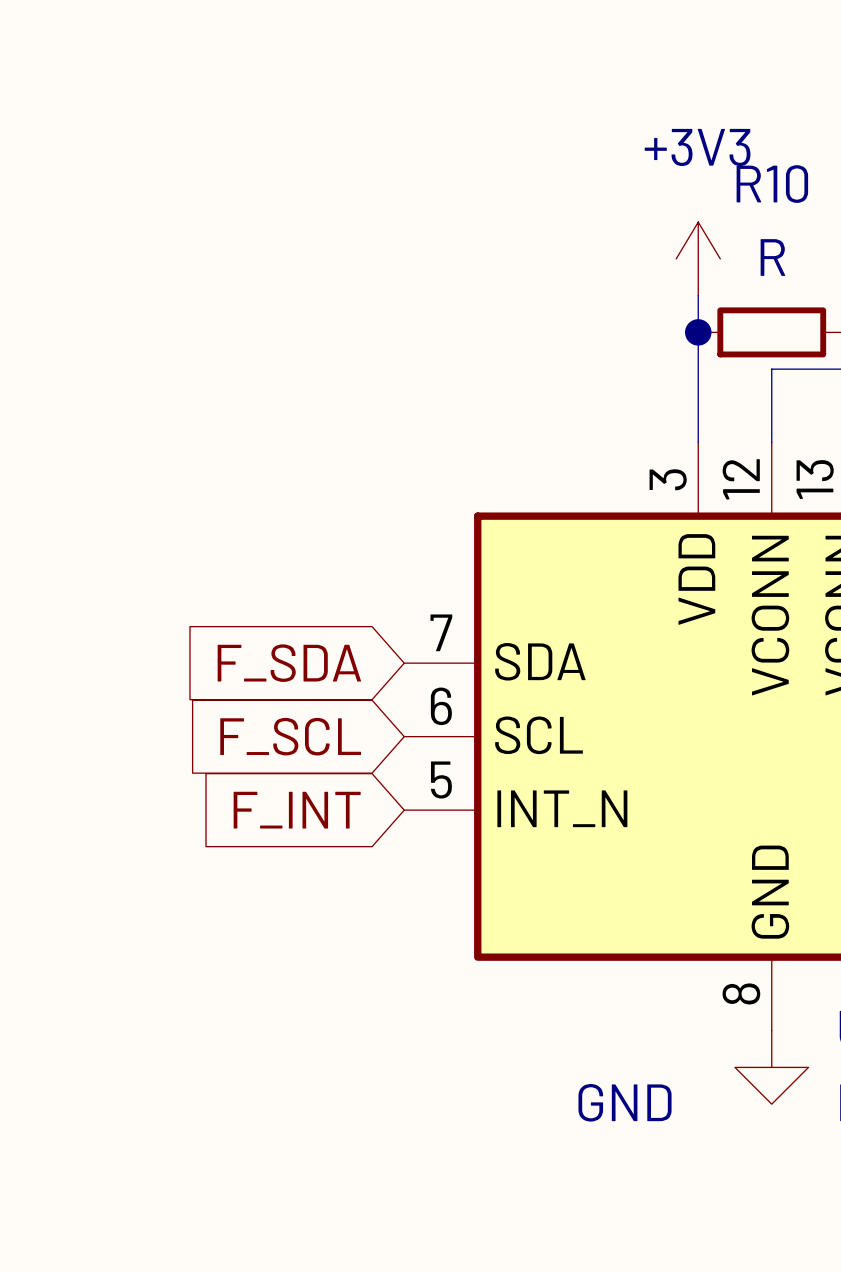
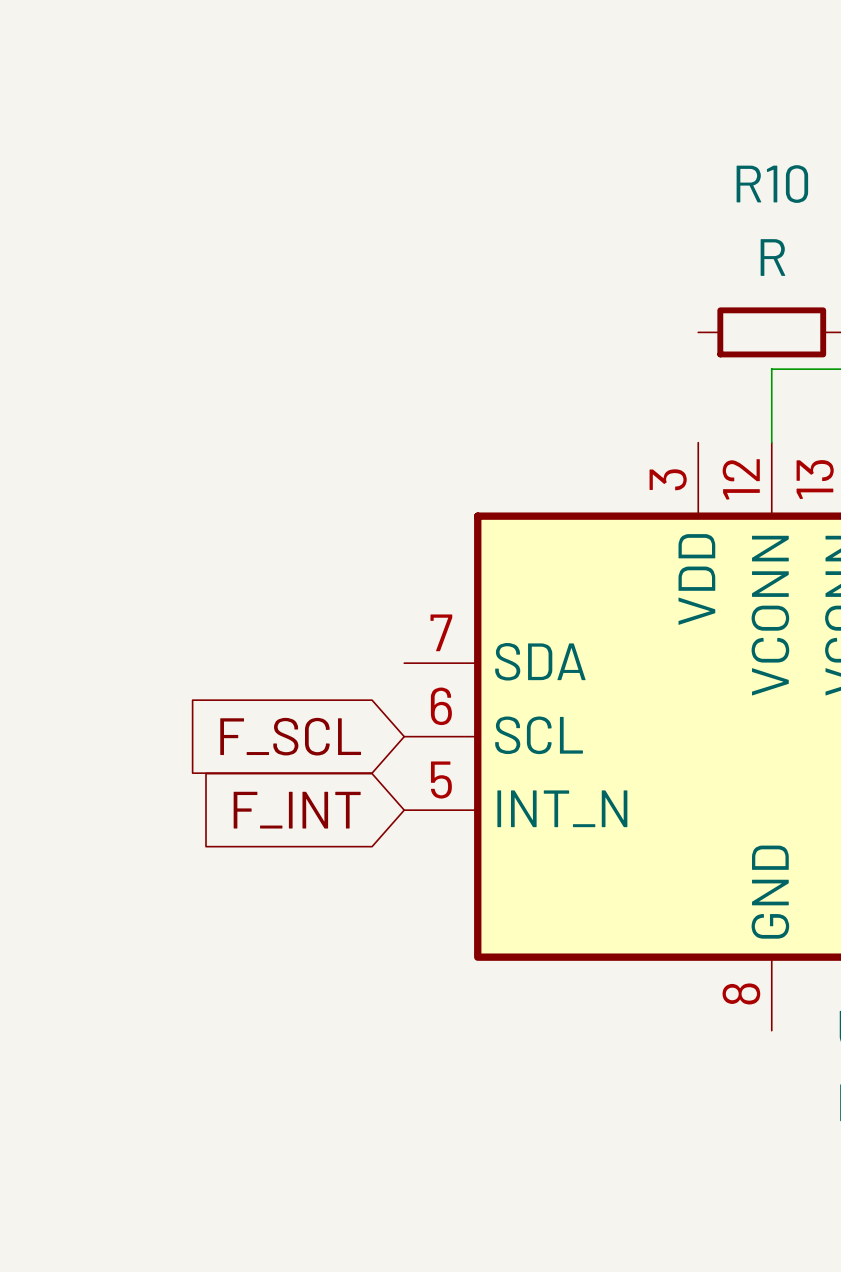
power symbol: +3V3 (698, 258) -> none
wire: (698, 295) (698, 442) -> none
junction: (698, 332) -> none
global label: F_SDA (289, 663) -> none
power symbol: GND (771, 1067) -> none

